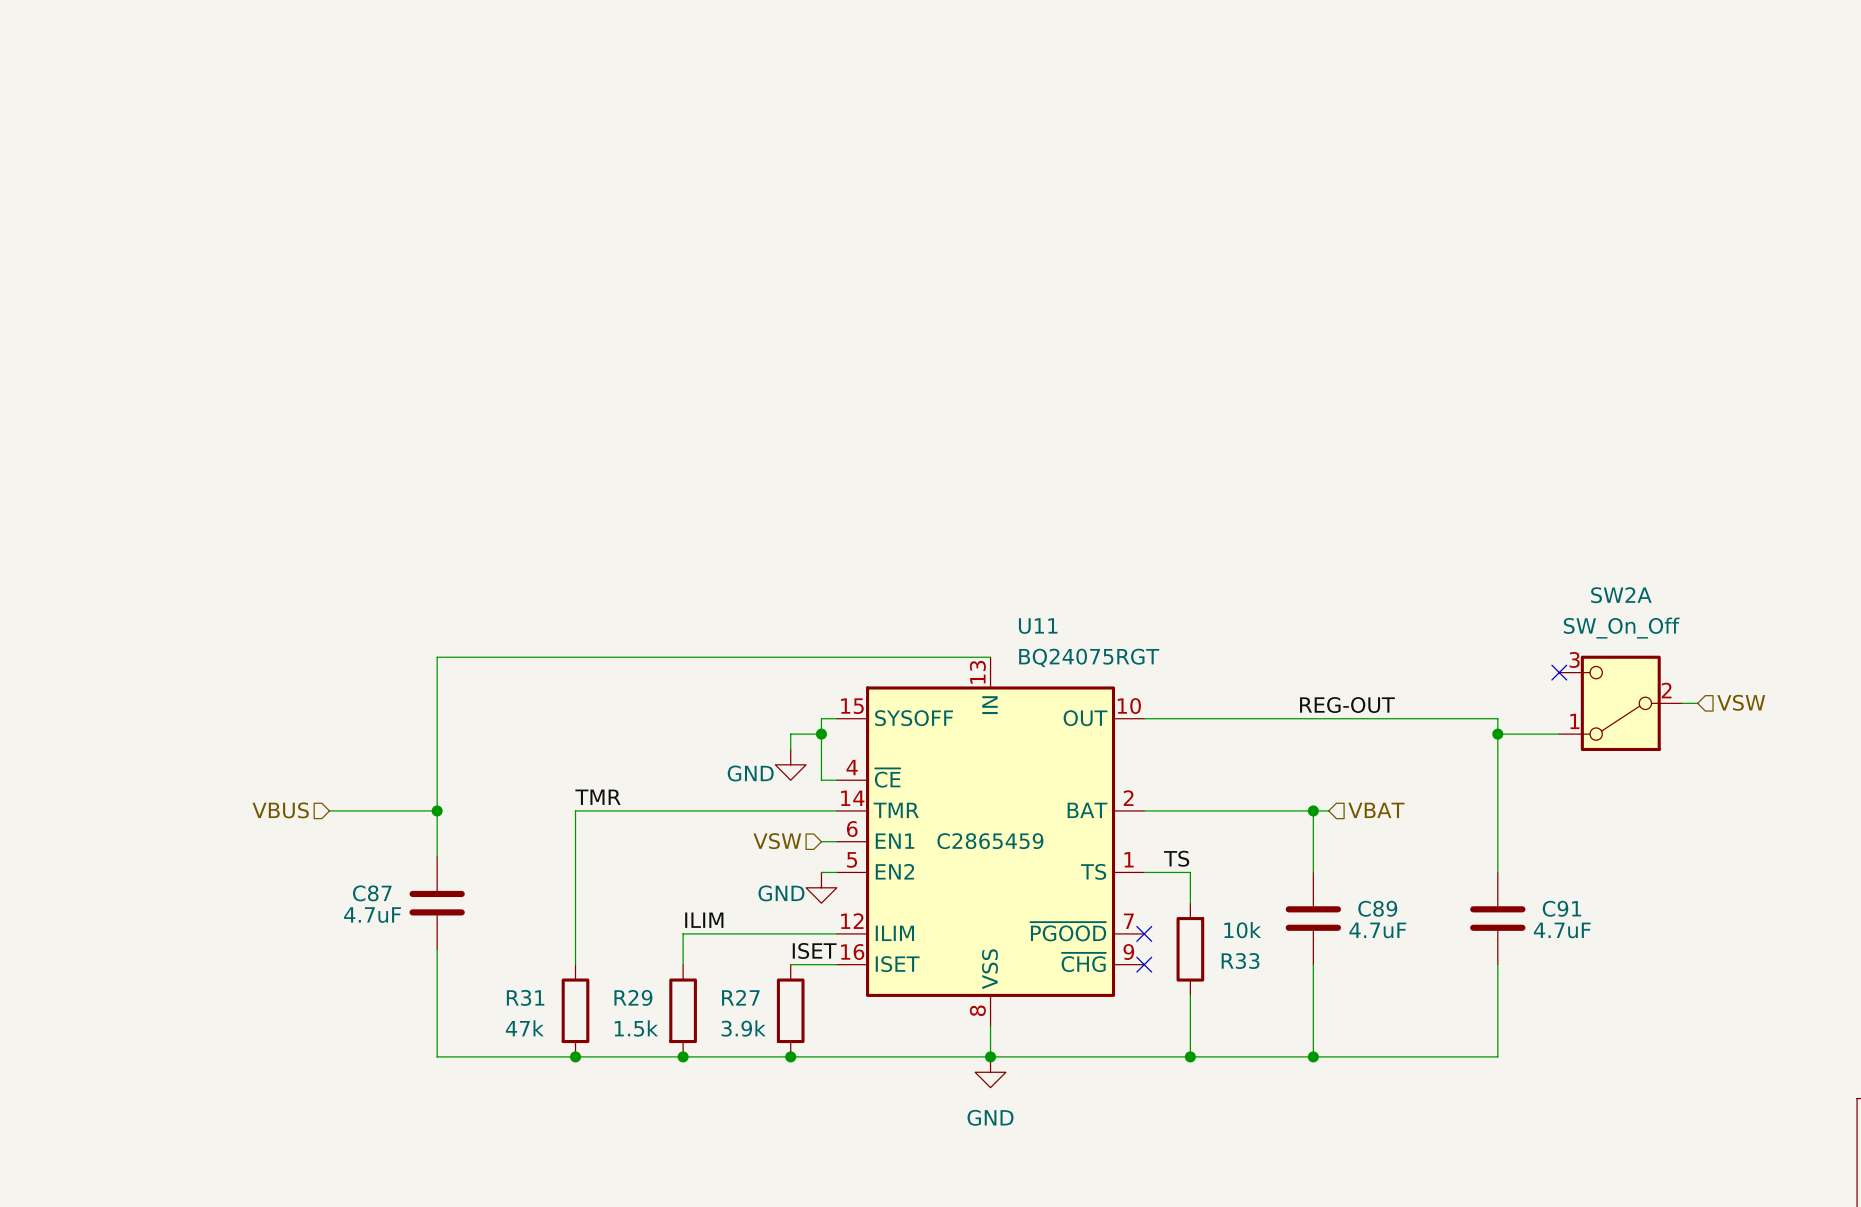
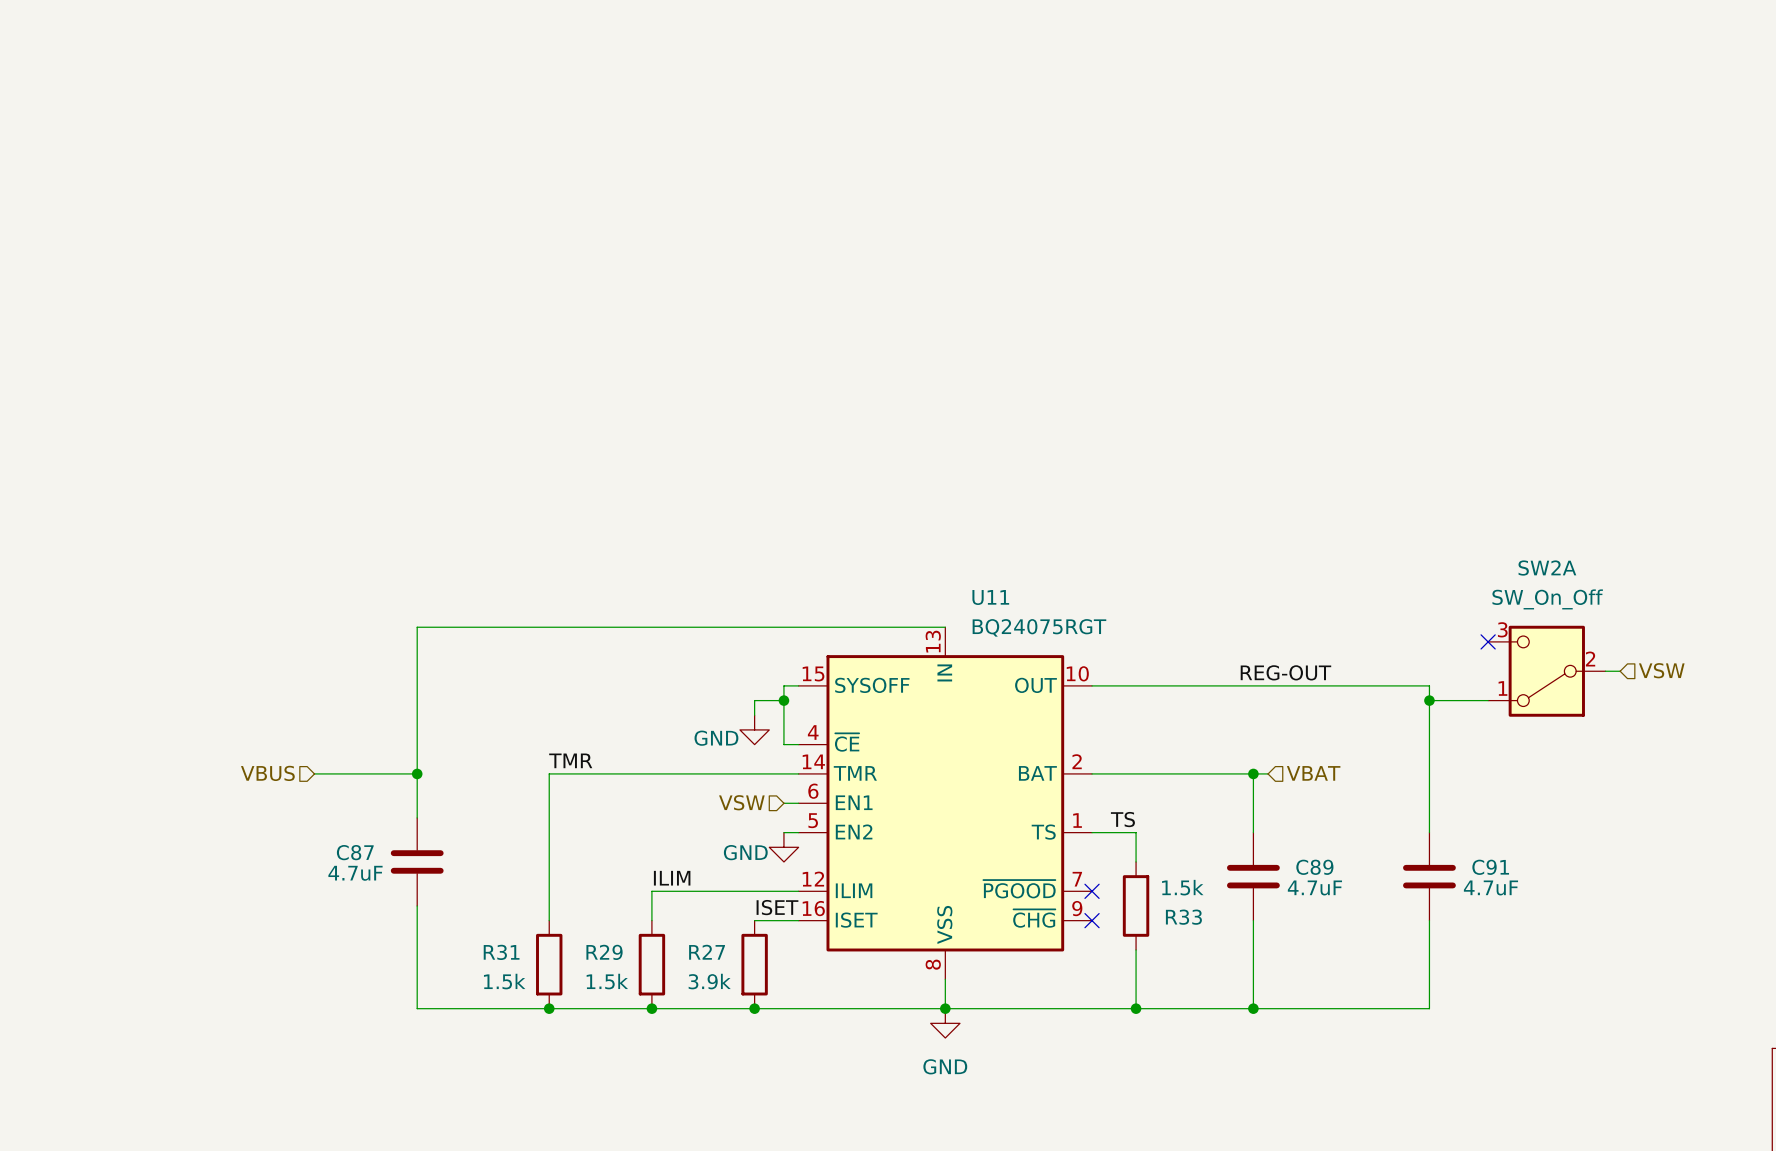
U11 text: C2865459 (990, 841) -> none
R33 value: 10k (1242, 930) -> 1.5k (1182, 887)
R31 value: 47k (524, 1028) -> 1.5k (504, 981)

